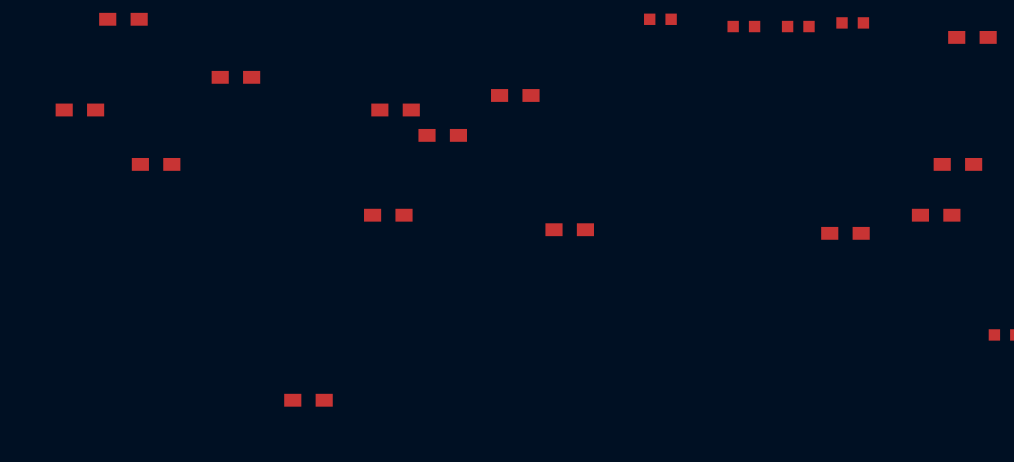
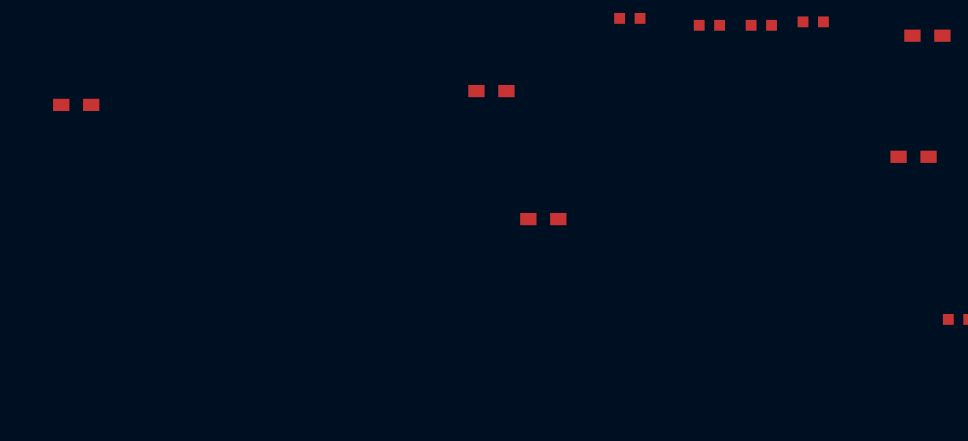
part: (123, 19) -> none
part: (235, 77) -> none
part: (395, 109) -> none
part: (442, 135) -> none
part: (156, 164) -> none
part: (388, 215) -> none
part: (936, 215) -> none
part: (845, 233) -> none
part: (308, 400) -> none

